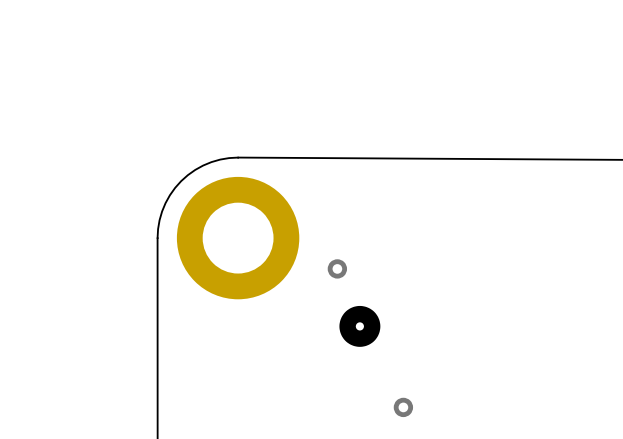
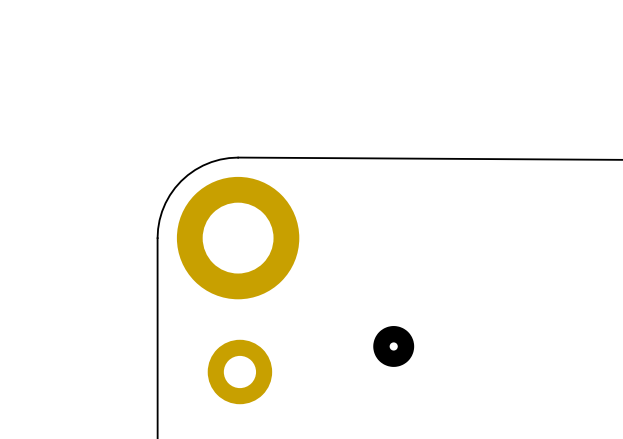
via: (337, 268) -> none
part position: (359, 326) -> (393, 346)
part: none -> (239, 372)
via: (403, 407) -> none

